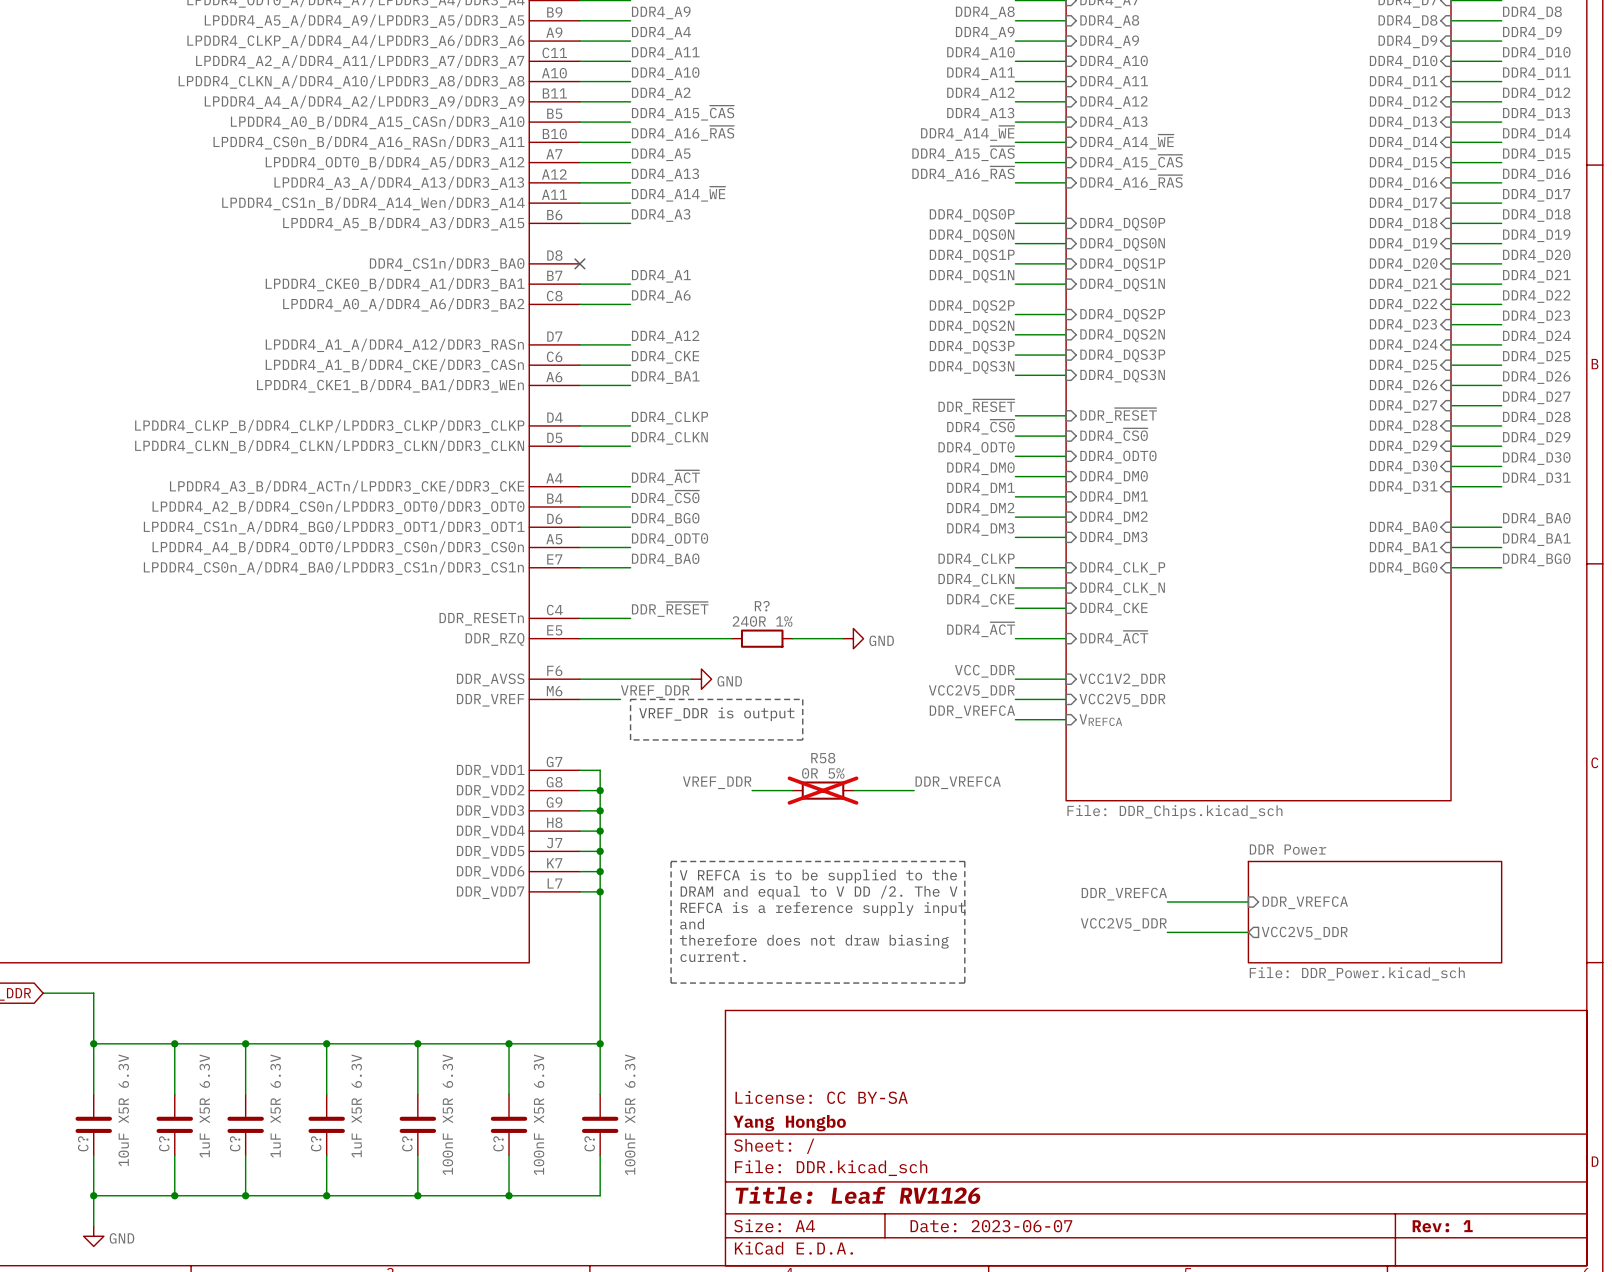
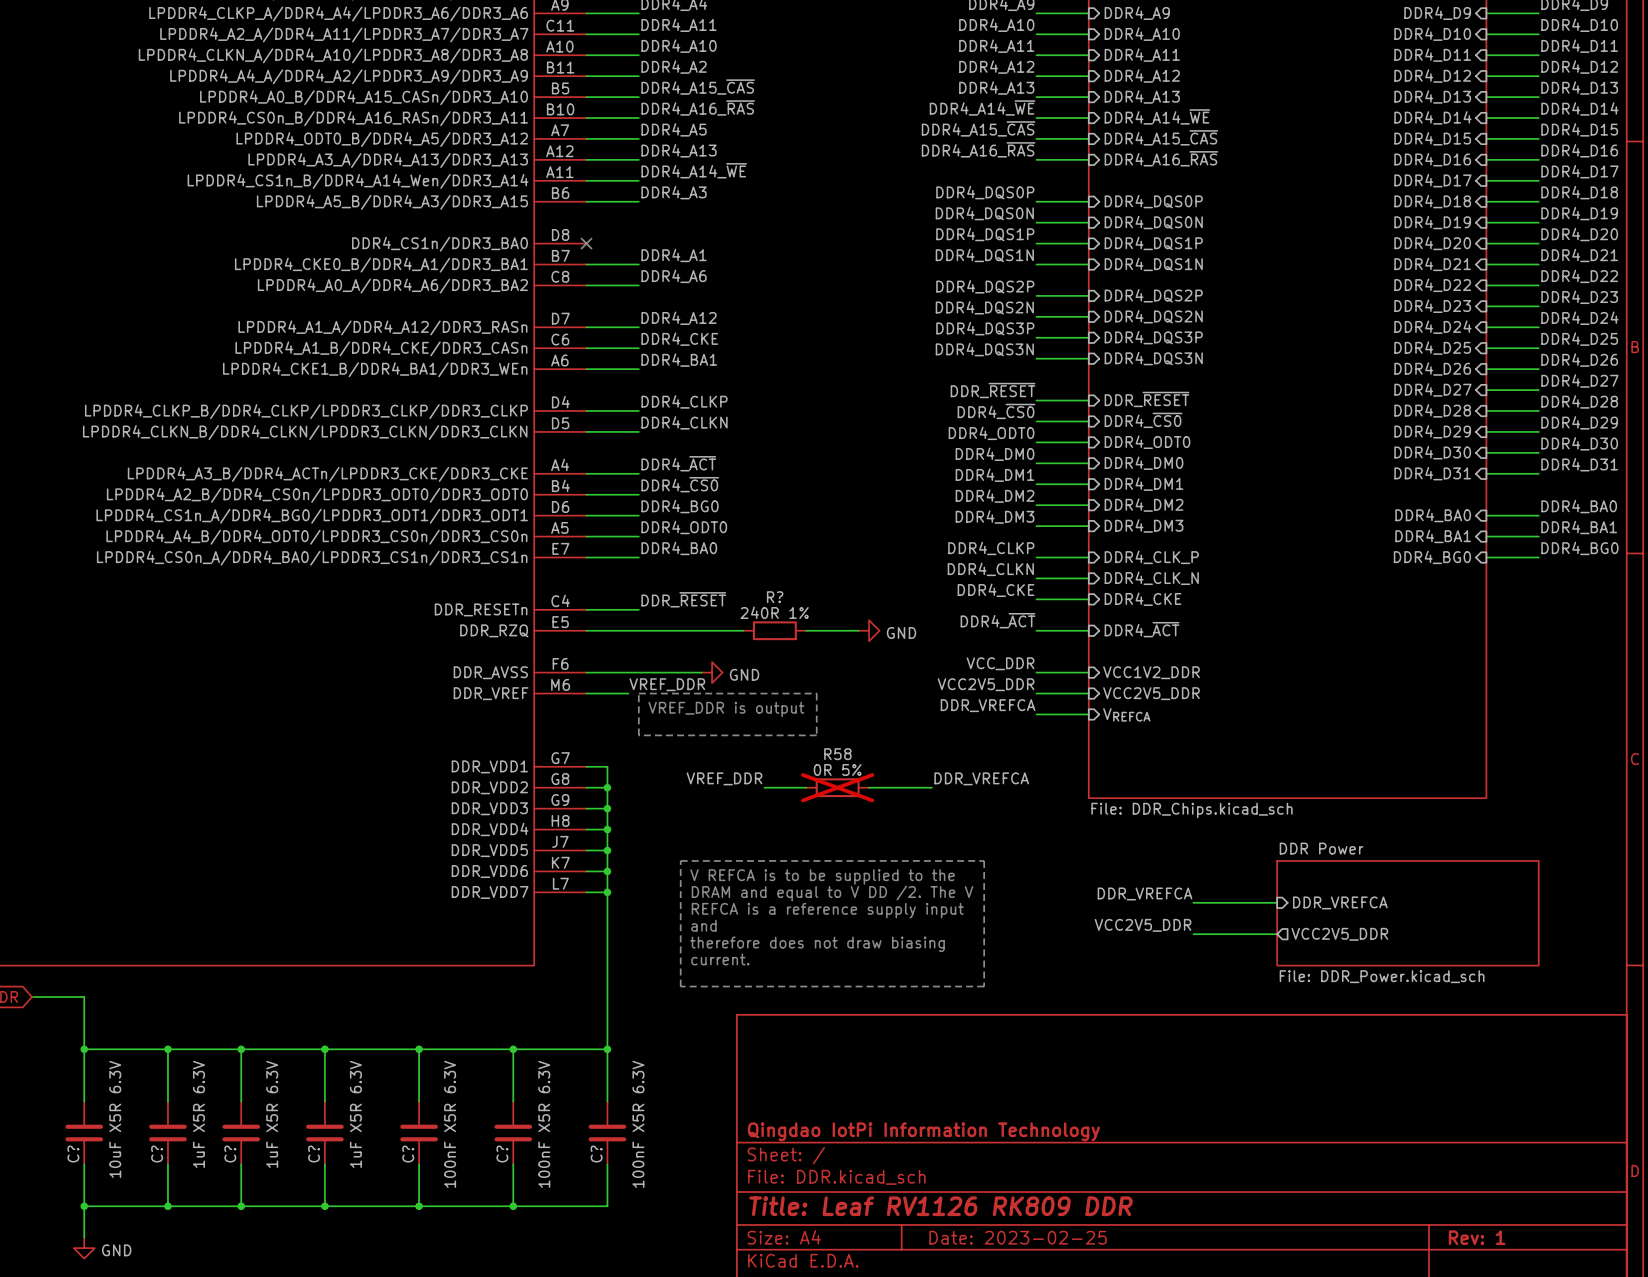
title block: License: CC BY-SA (821, 1097) -> none
title block: Yang Hongbo (789, 1123) -> Qingdao IotPi Information Technology (923, 1131)
title block: Title: Leaf RV1126 (858, 1195) -> Title: Leaf RV1126 RK809 DDR (941, 1206)
title block: Date: 2023-06-07 (991, 1226) -> Date: 2023-02-25 (1018, 1237)

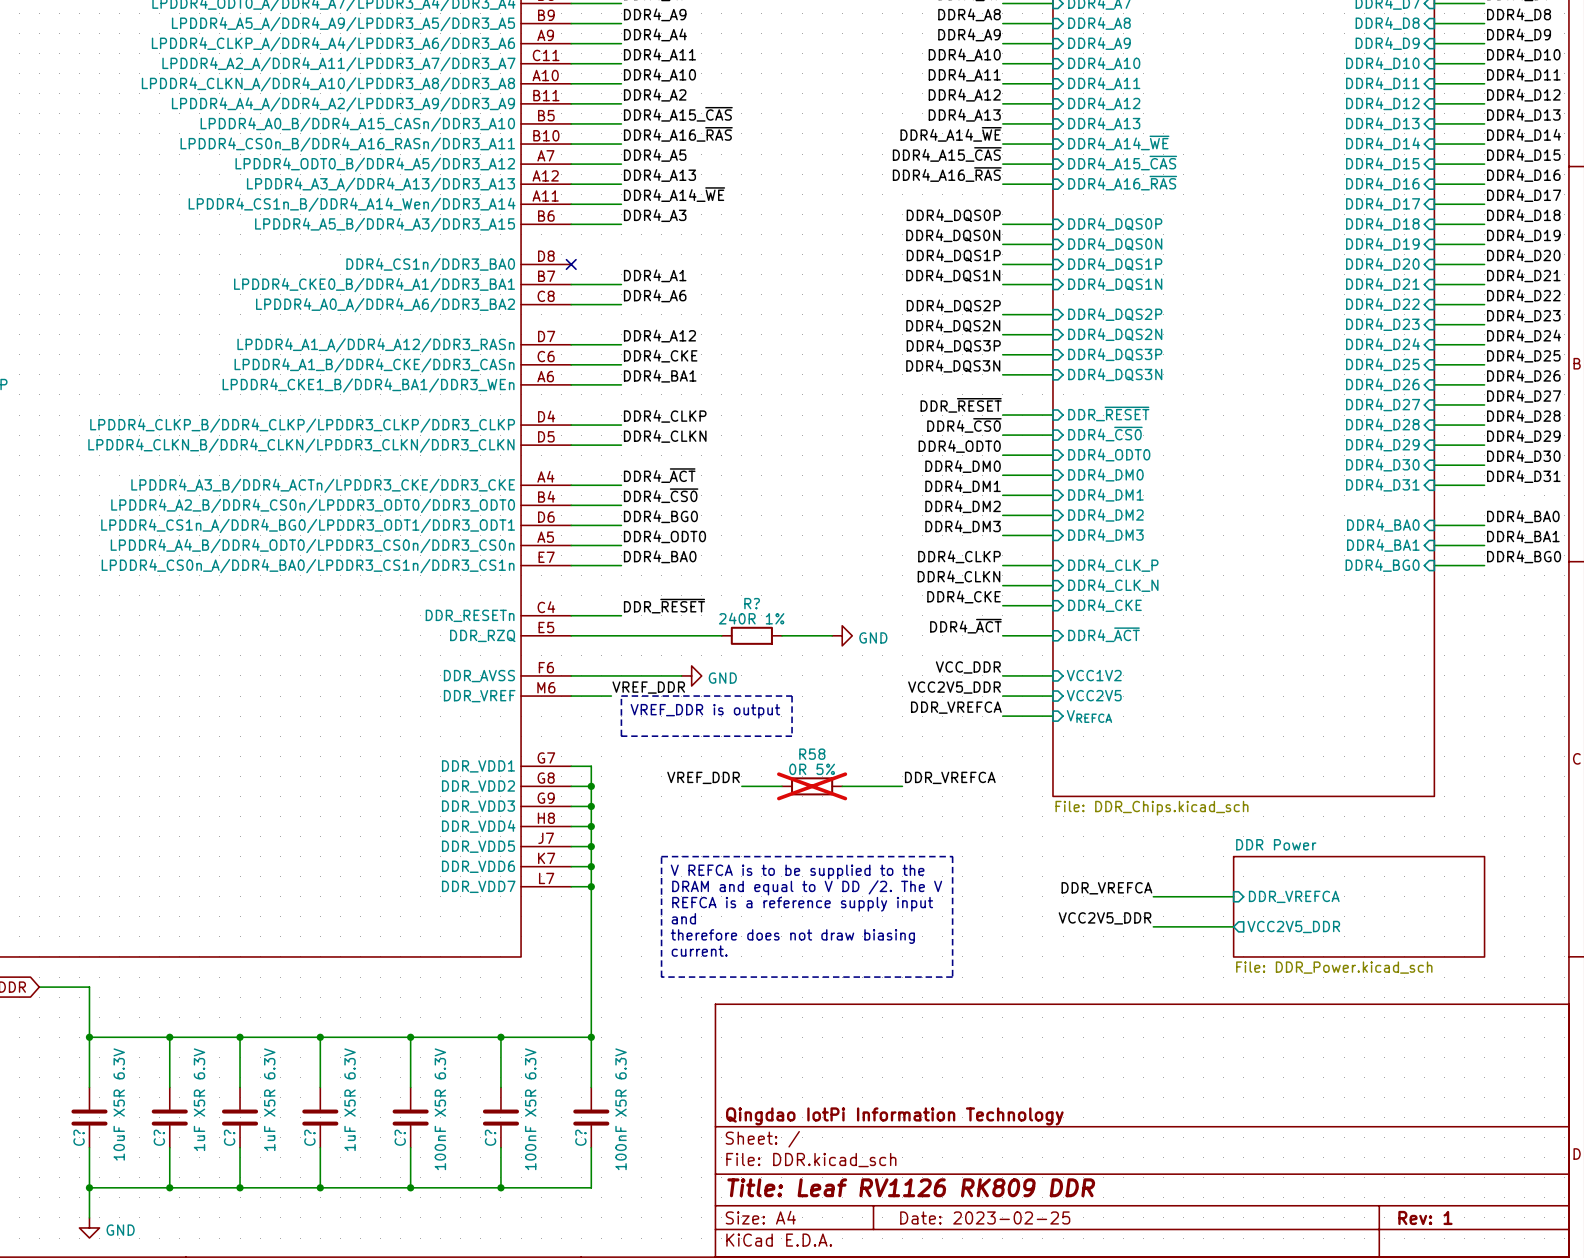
sheet pin: VCC1V2_DDR (1151, 672) -> VCC1V2 (1094, 675)
sheet pin: VCC2V5_DDR (1151, 693) -> VCC2V5 (1094, 695)

